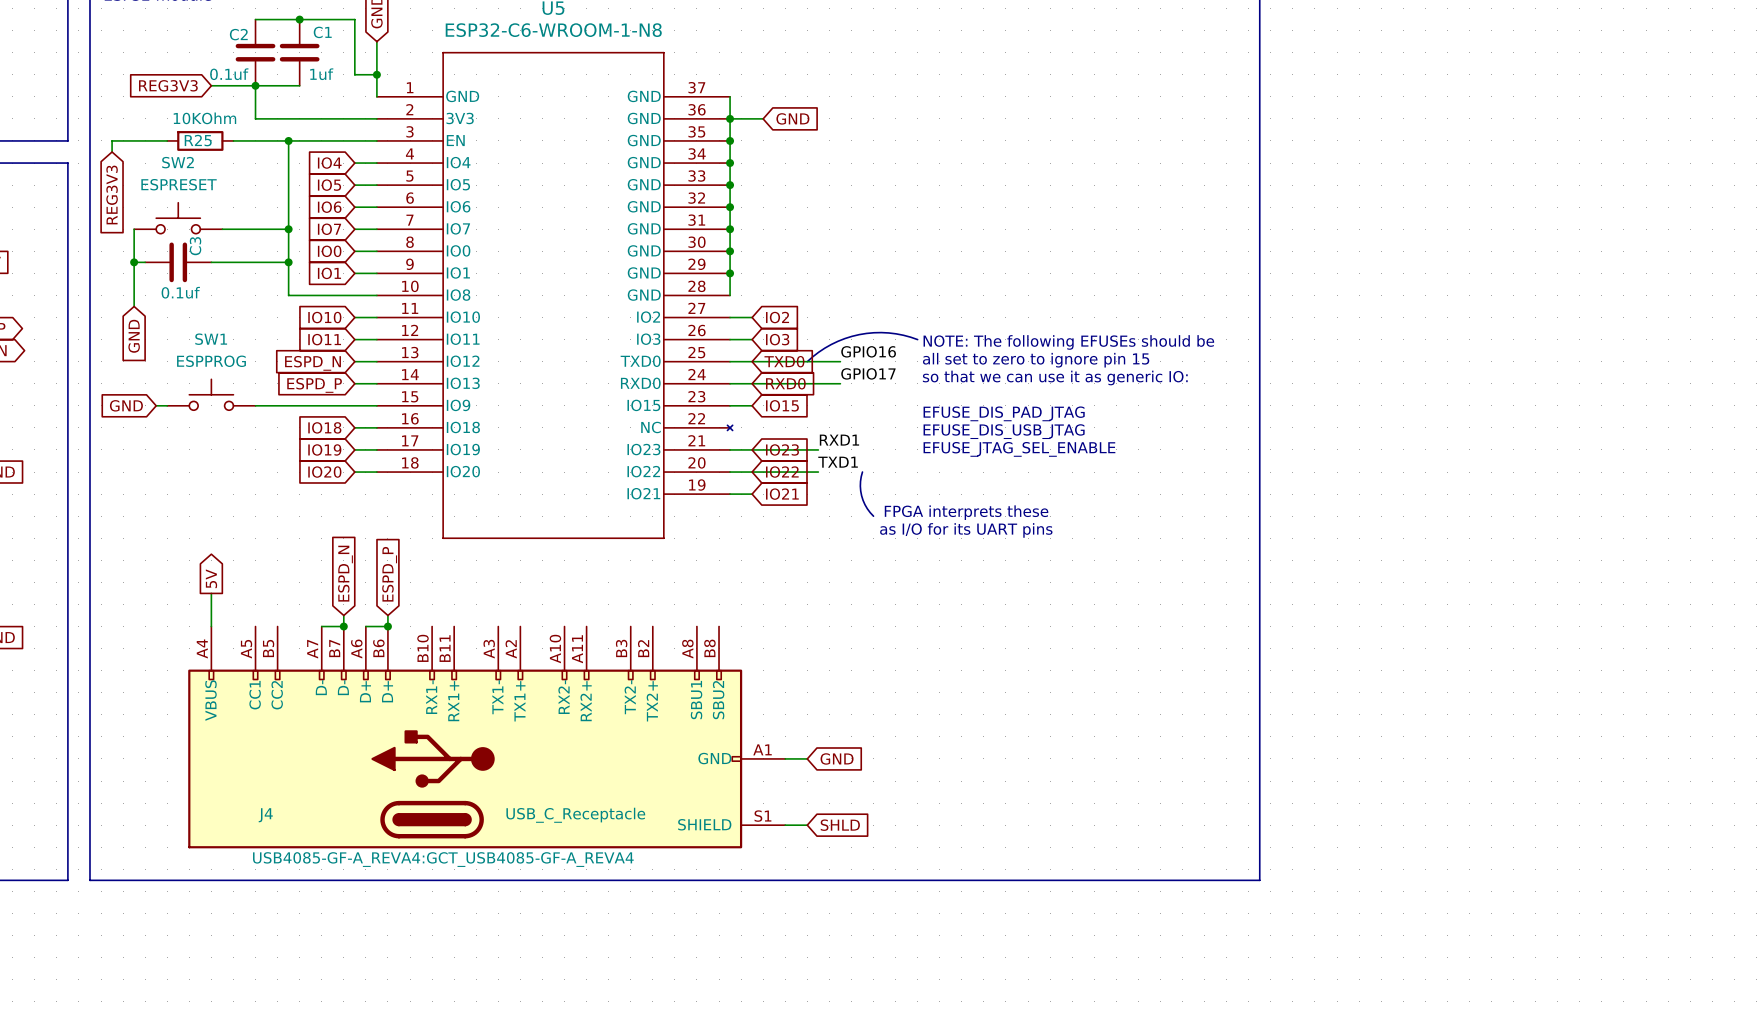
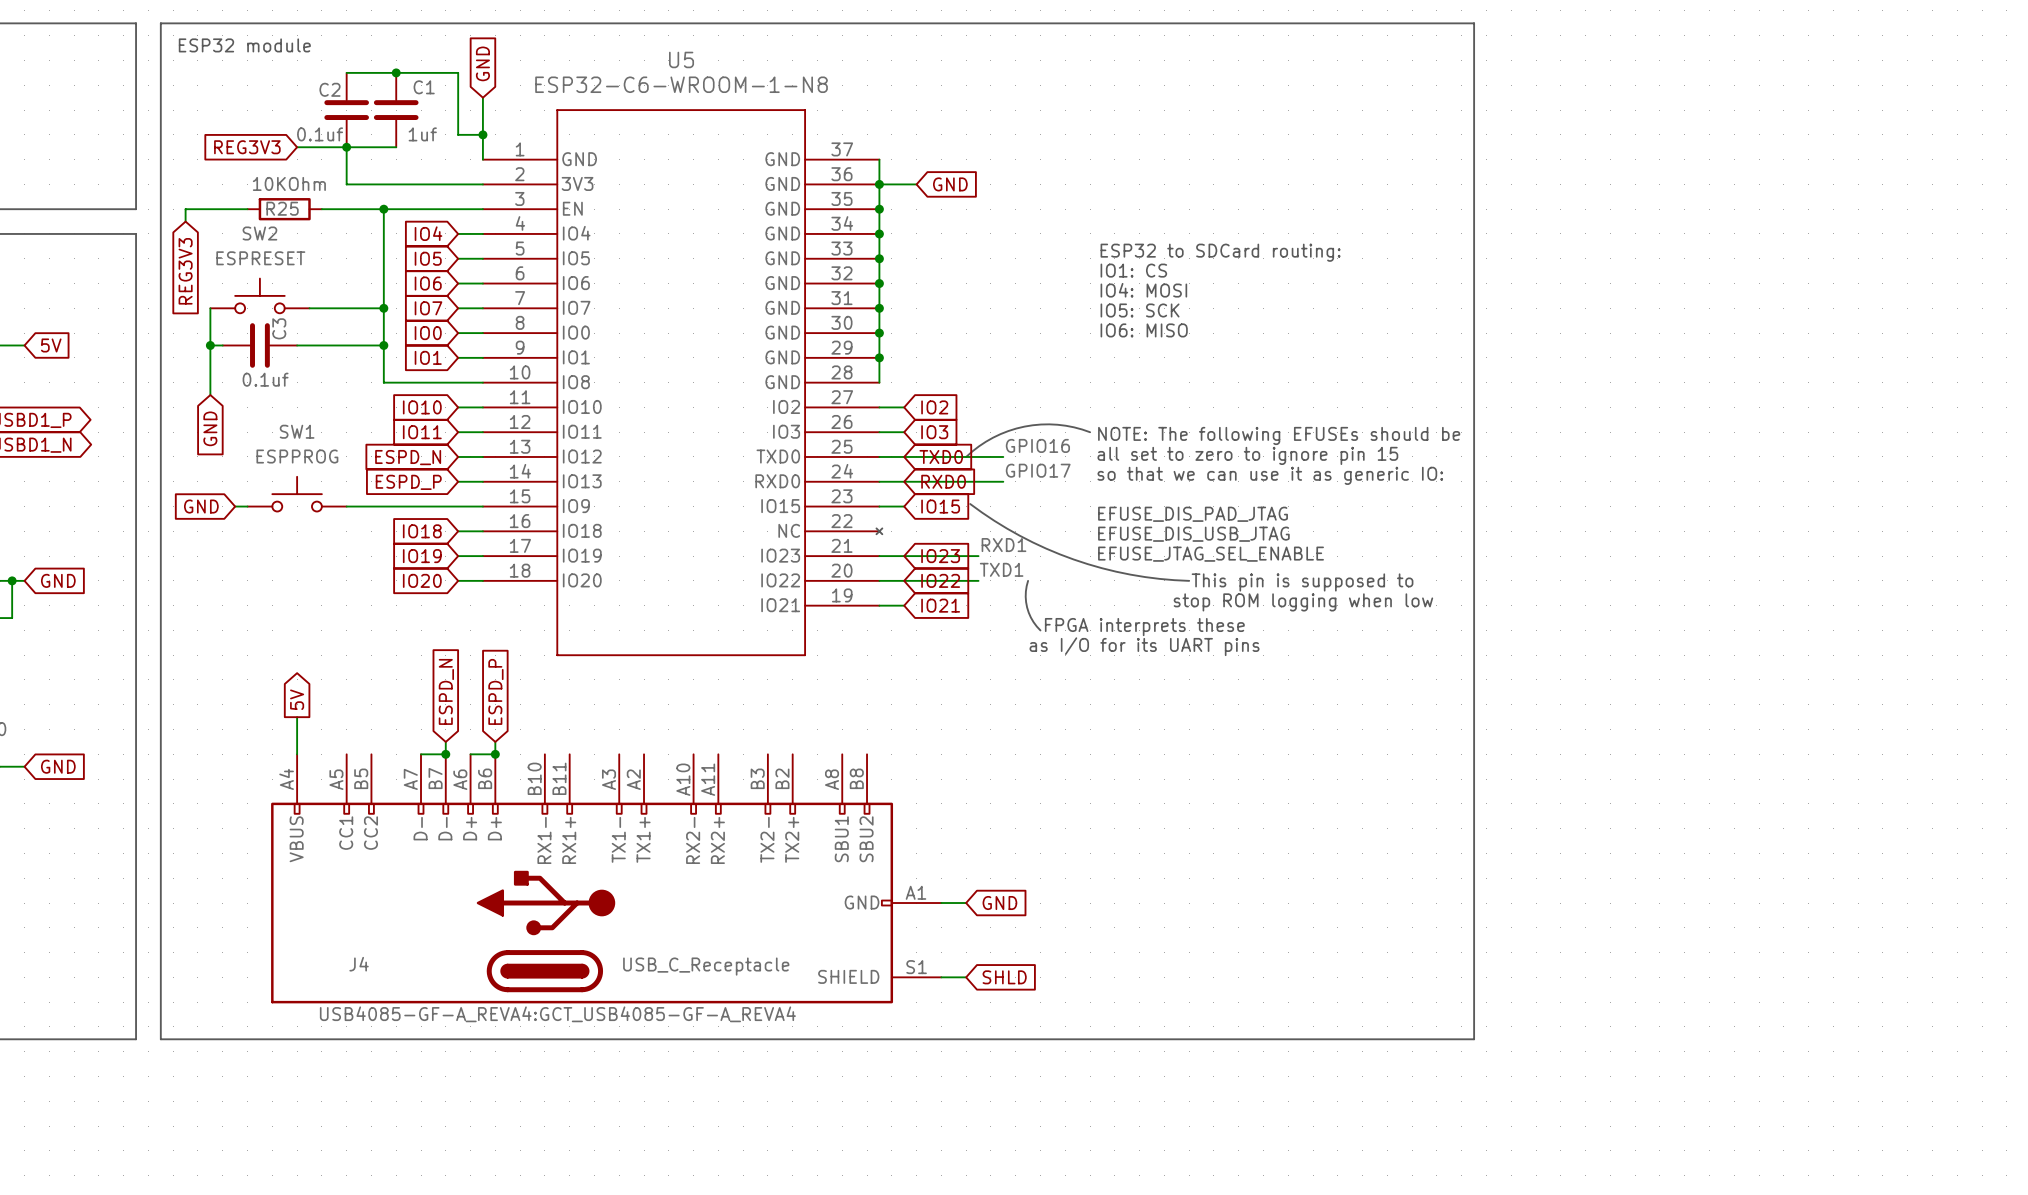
text: none -> ESP32 to SDCard routing: (1220, 252)
text: none -> IO1: CS (1133, 270)
text: none -> IO4: MOSI (1143, 290)
text: none -> IO5: SCK (1140, 310)
text: none -> IO6: MISO (1144, 330)
line: none -> (970, 504) (1019, 535) (1073, 559) (1130, 574) (1189, 580)
text: none -> This pin is supposed to (1302, 582)
text: none -> stop ROM logging when low (1303, 602)

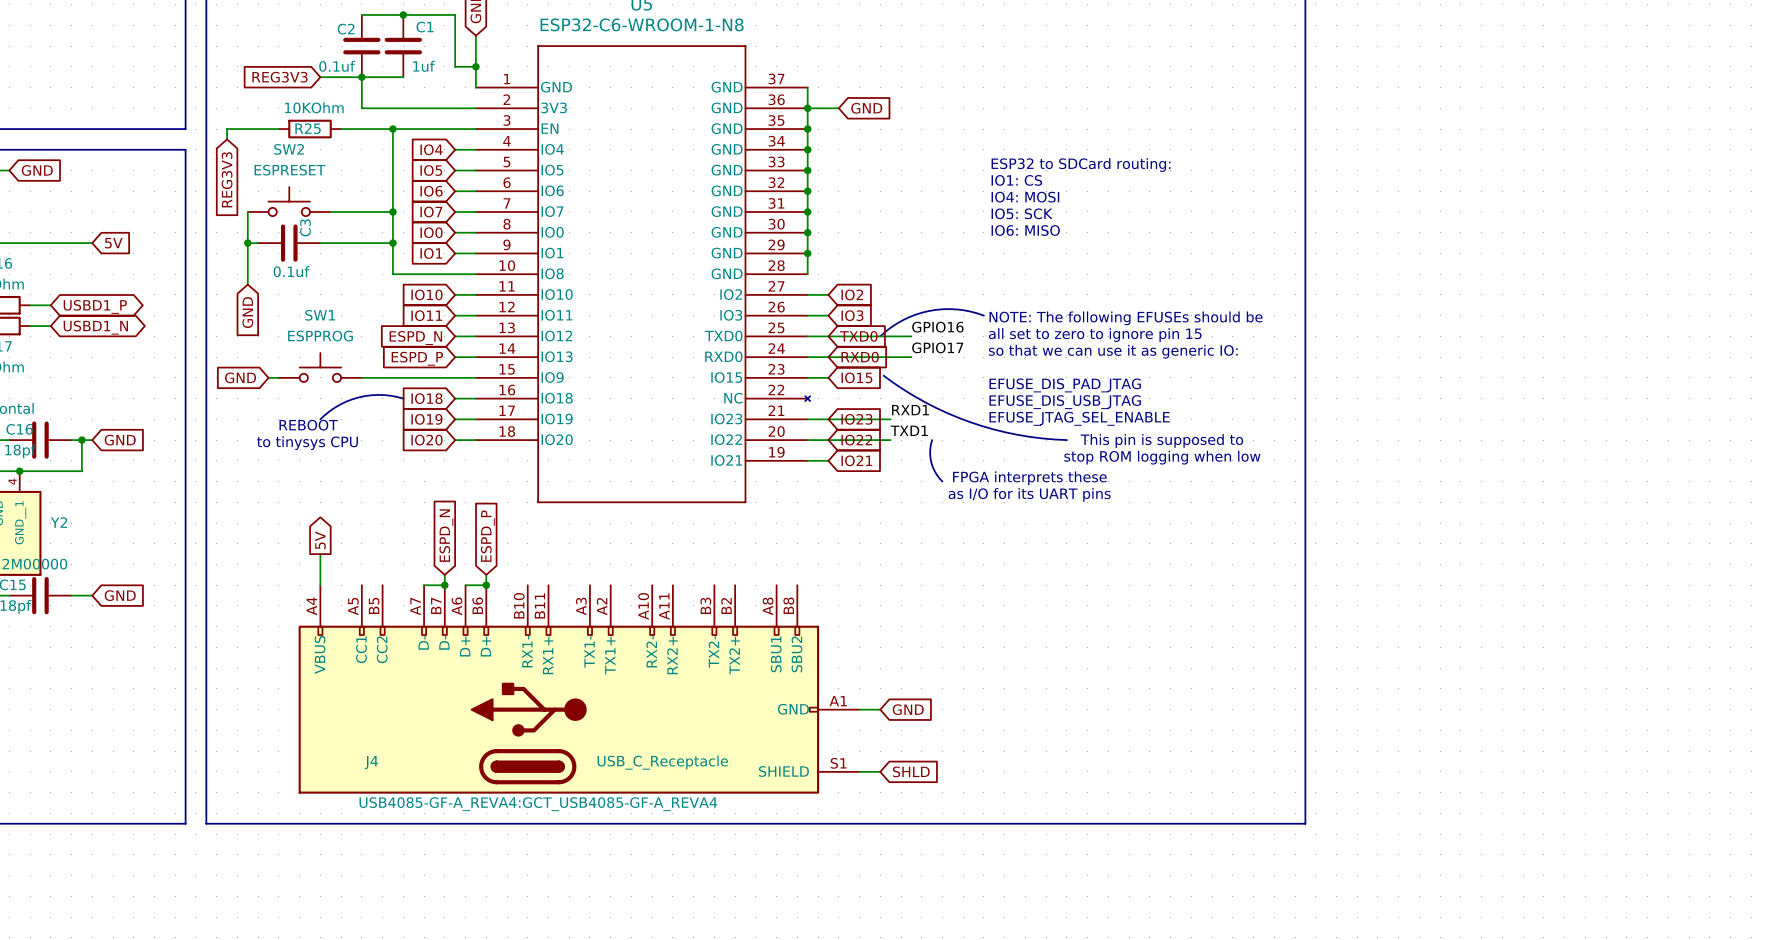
line: none -> (403, 398) (384, 395) (358, 397) (335, 407) (320, 419)
text: none -> REBOOT (308, 425)
text: none -> to tinysys CPU (307, 443)

